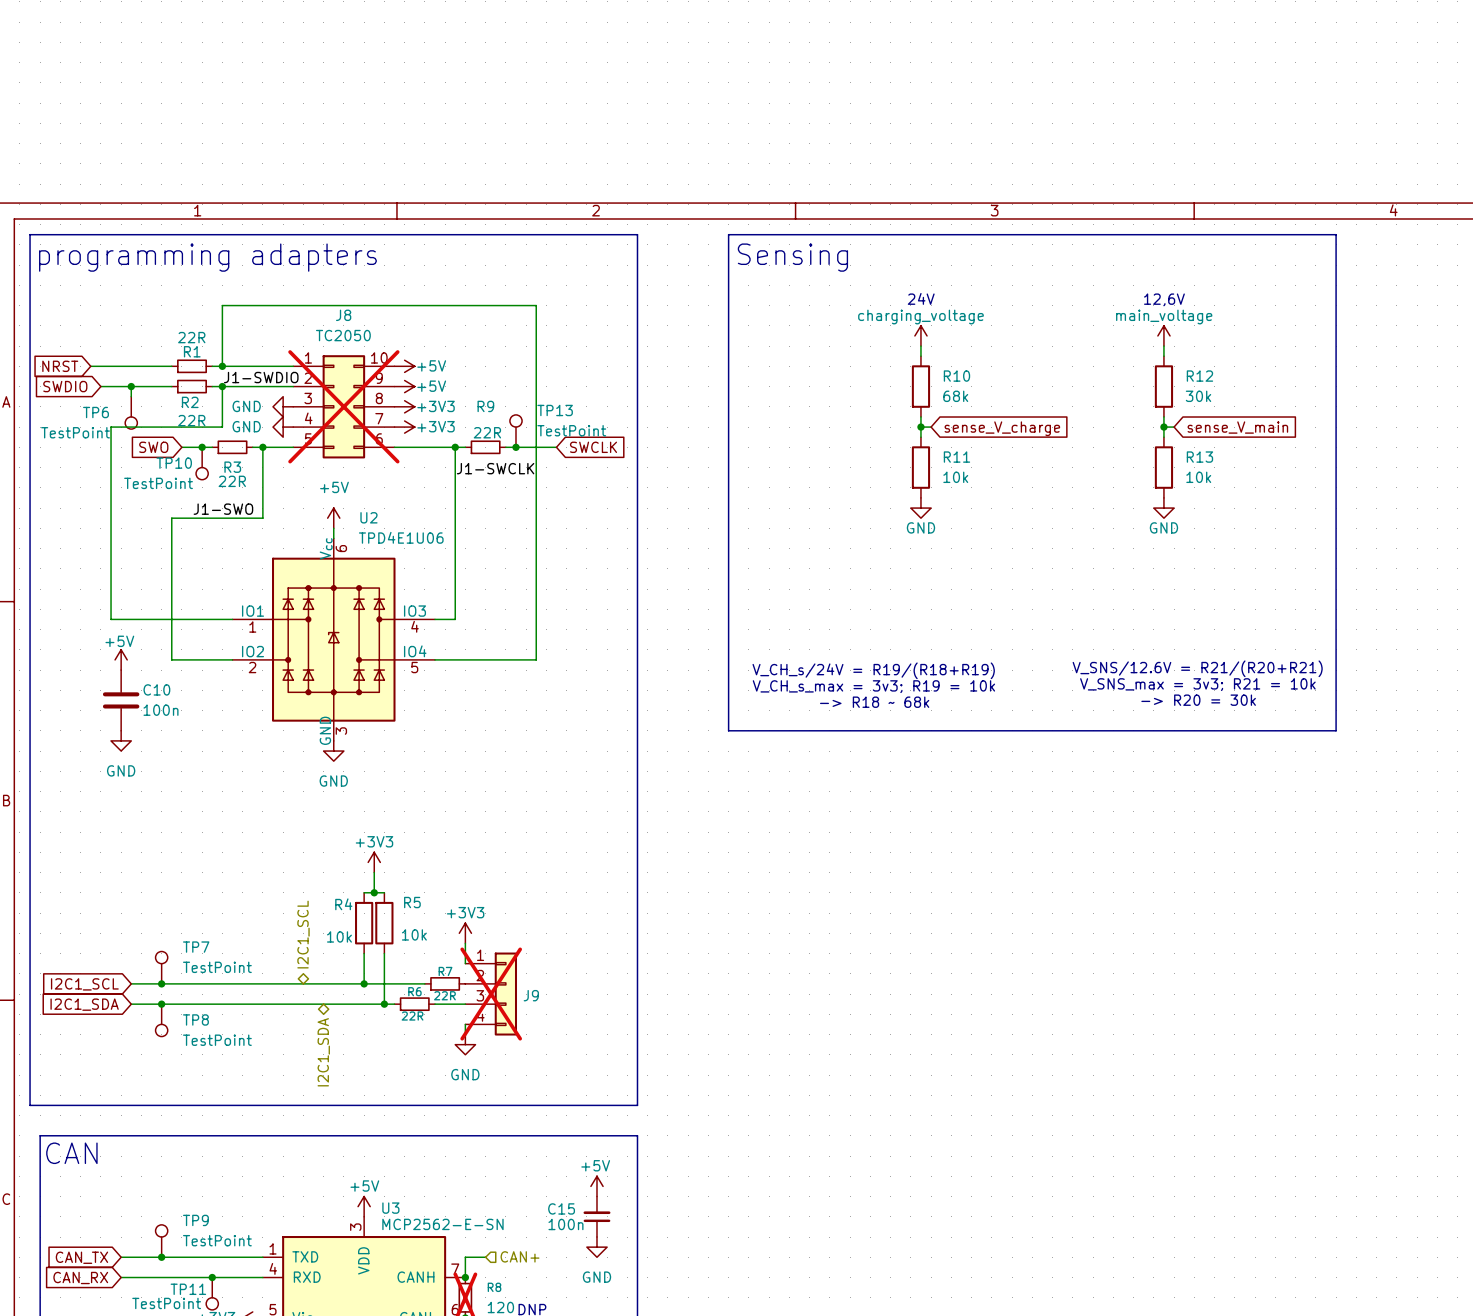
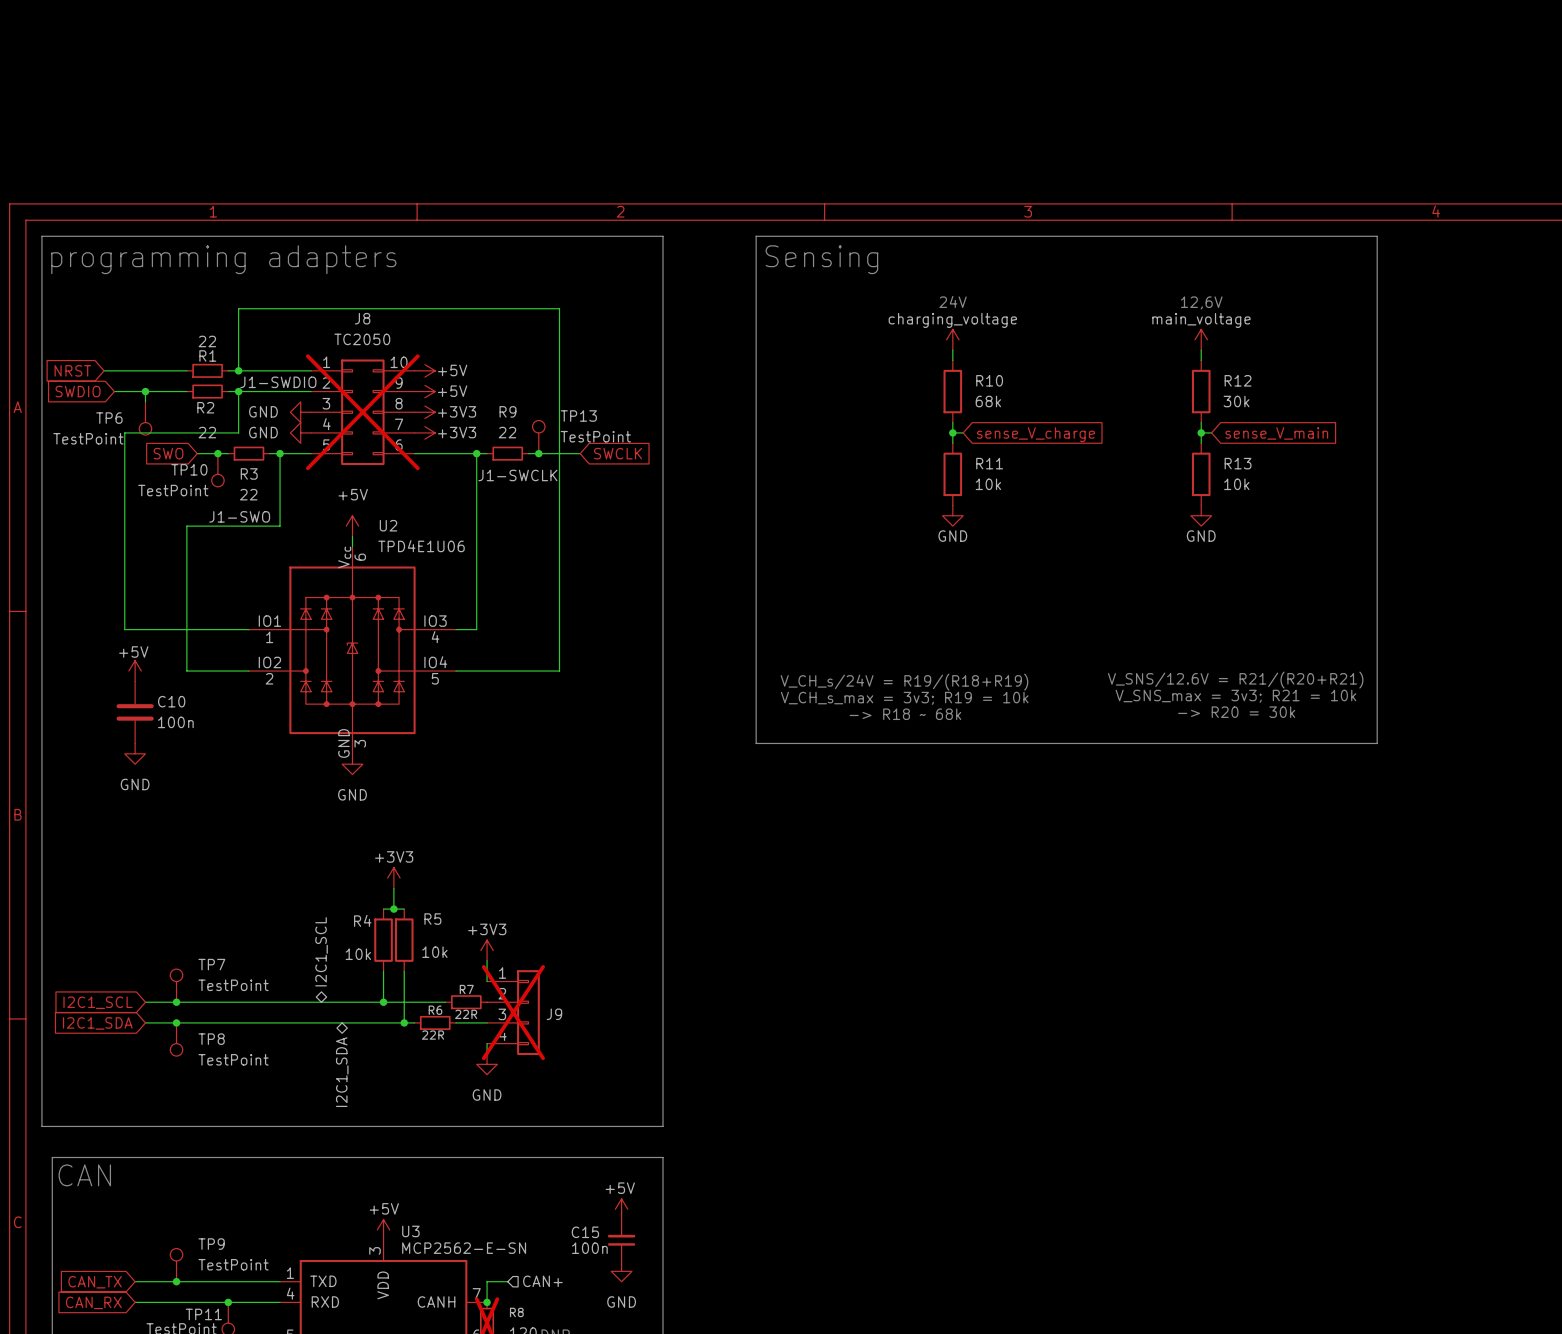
R1 value: 22R (191, 337) -> 22 (207, 341)
R2 value: 22R (191, 420) -> 22 (207, 432)
R9 value: 22R (487, 432) -> 22 (507, 432)
R3 value: 22R (232, 481) -> 22 (248, 494)

